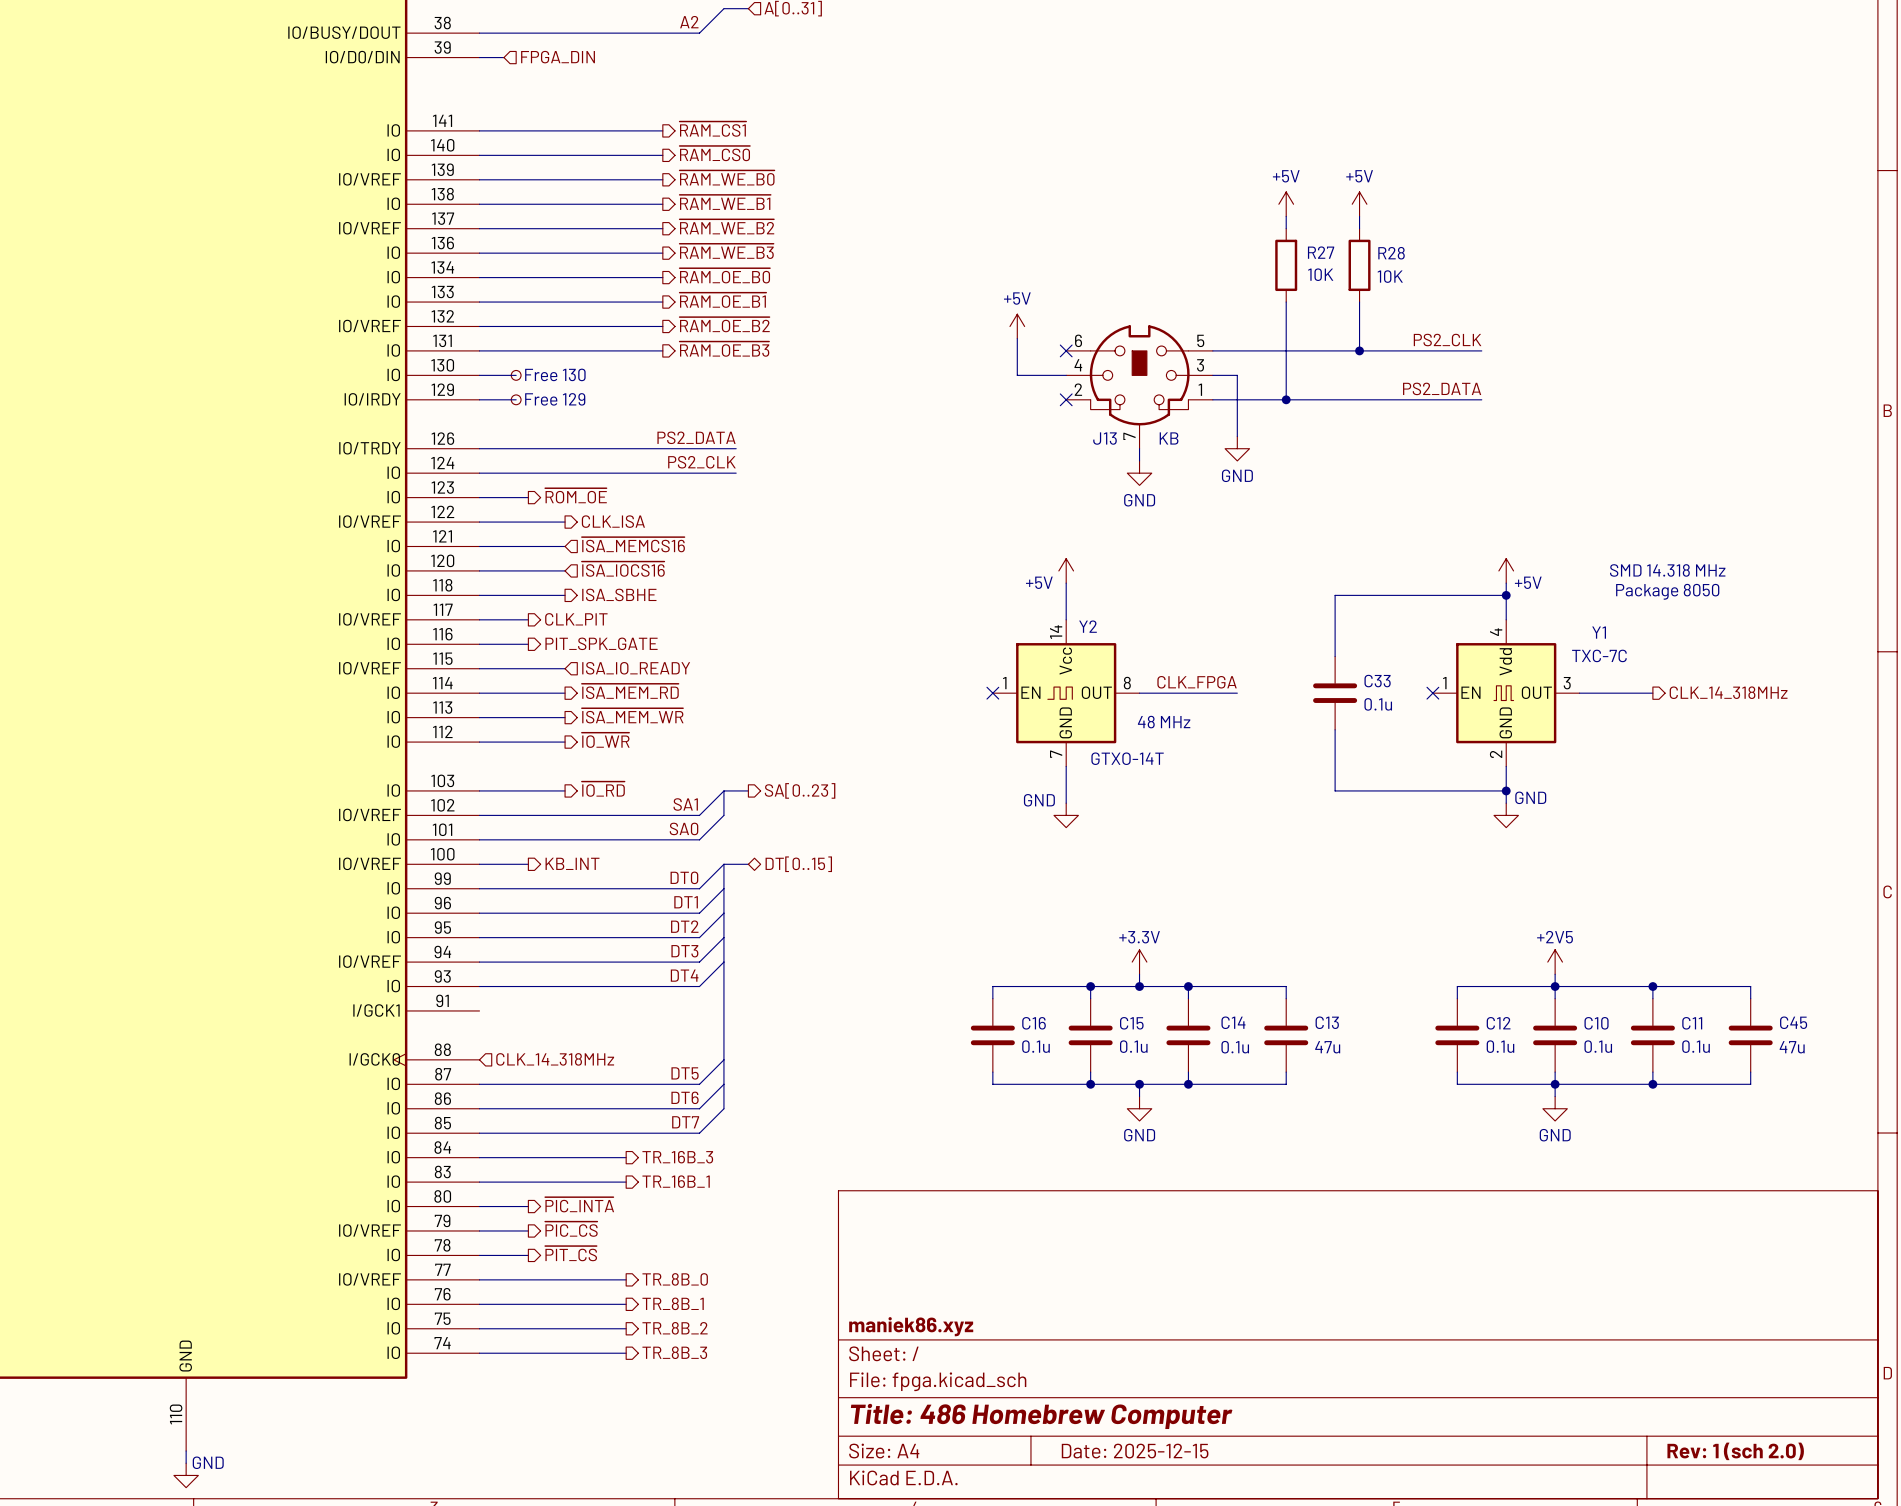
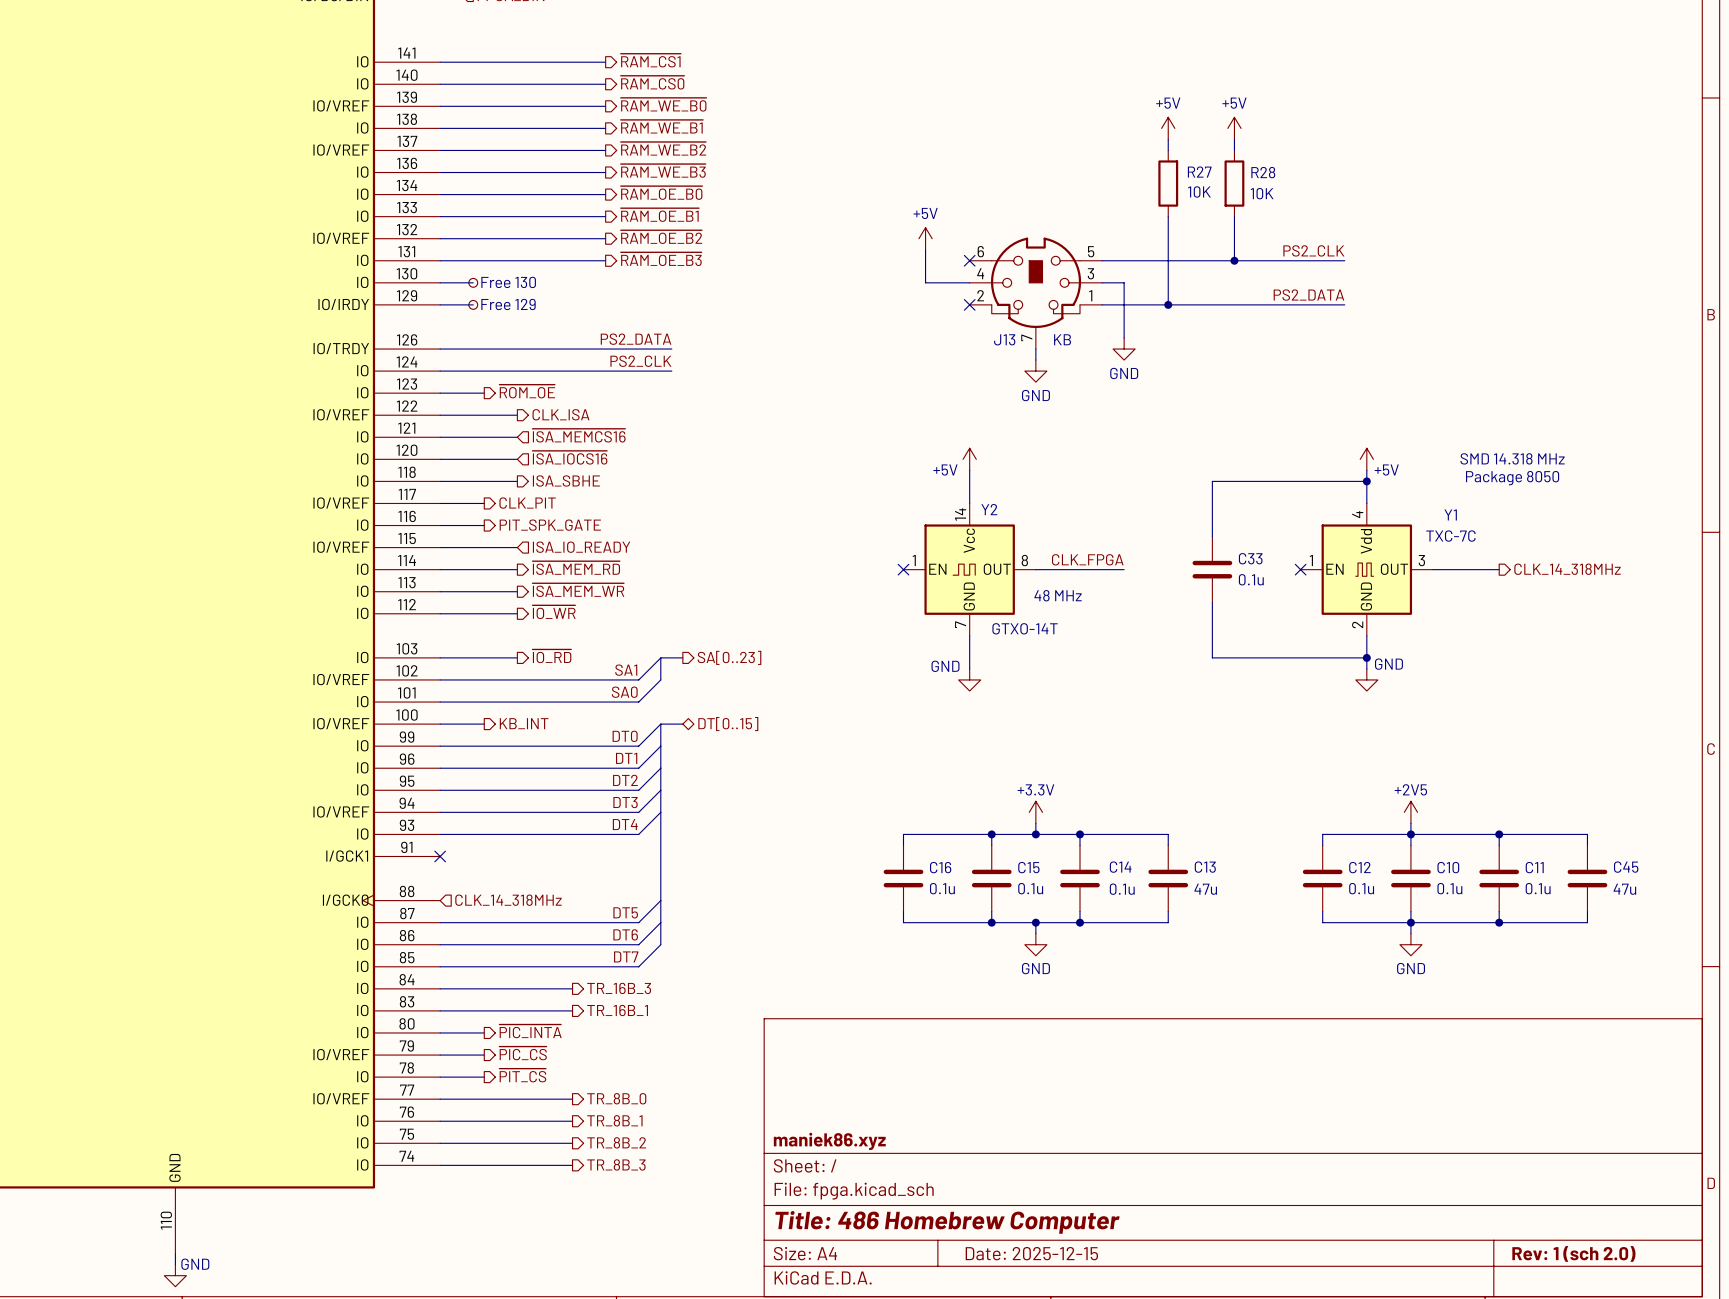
no-connect mark: none -> (440, 856)

